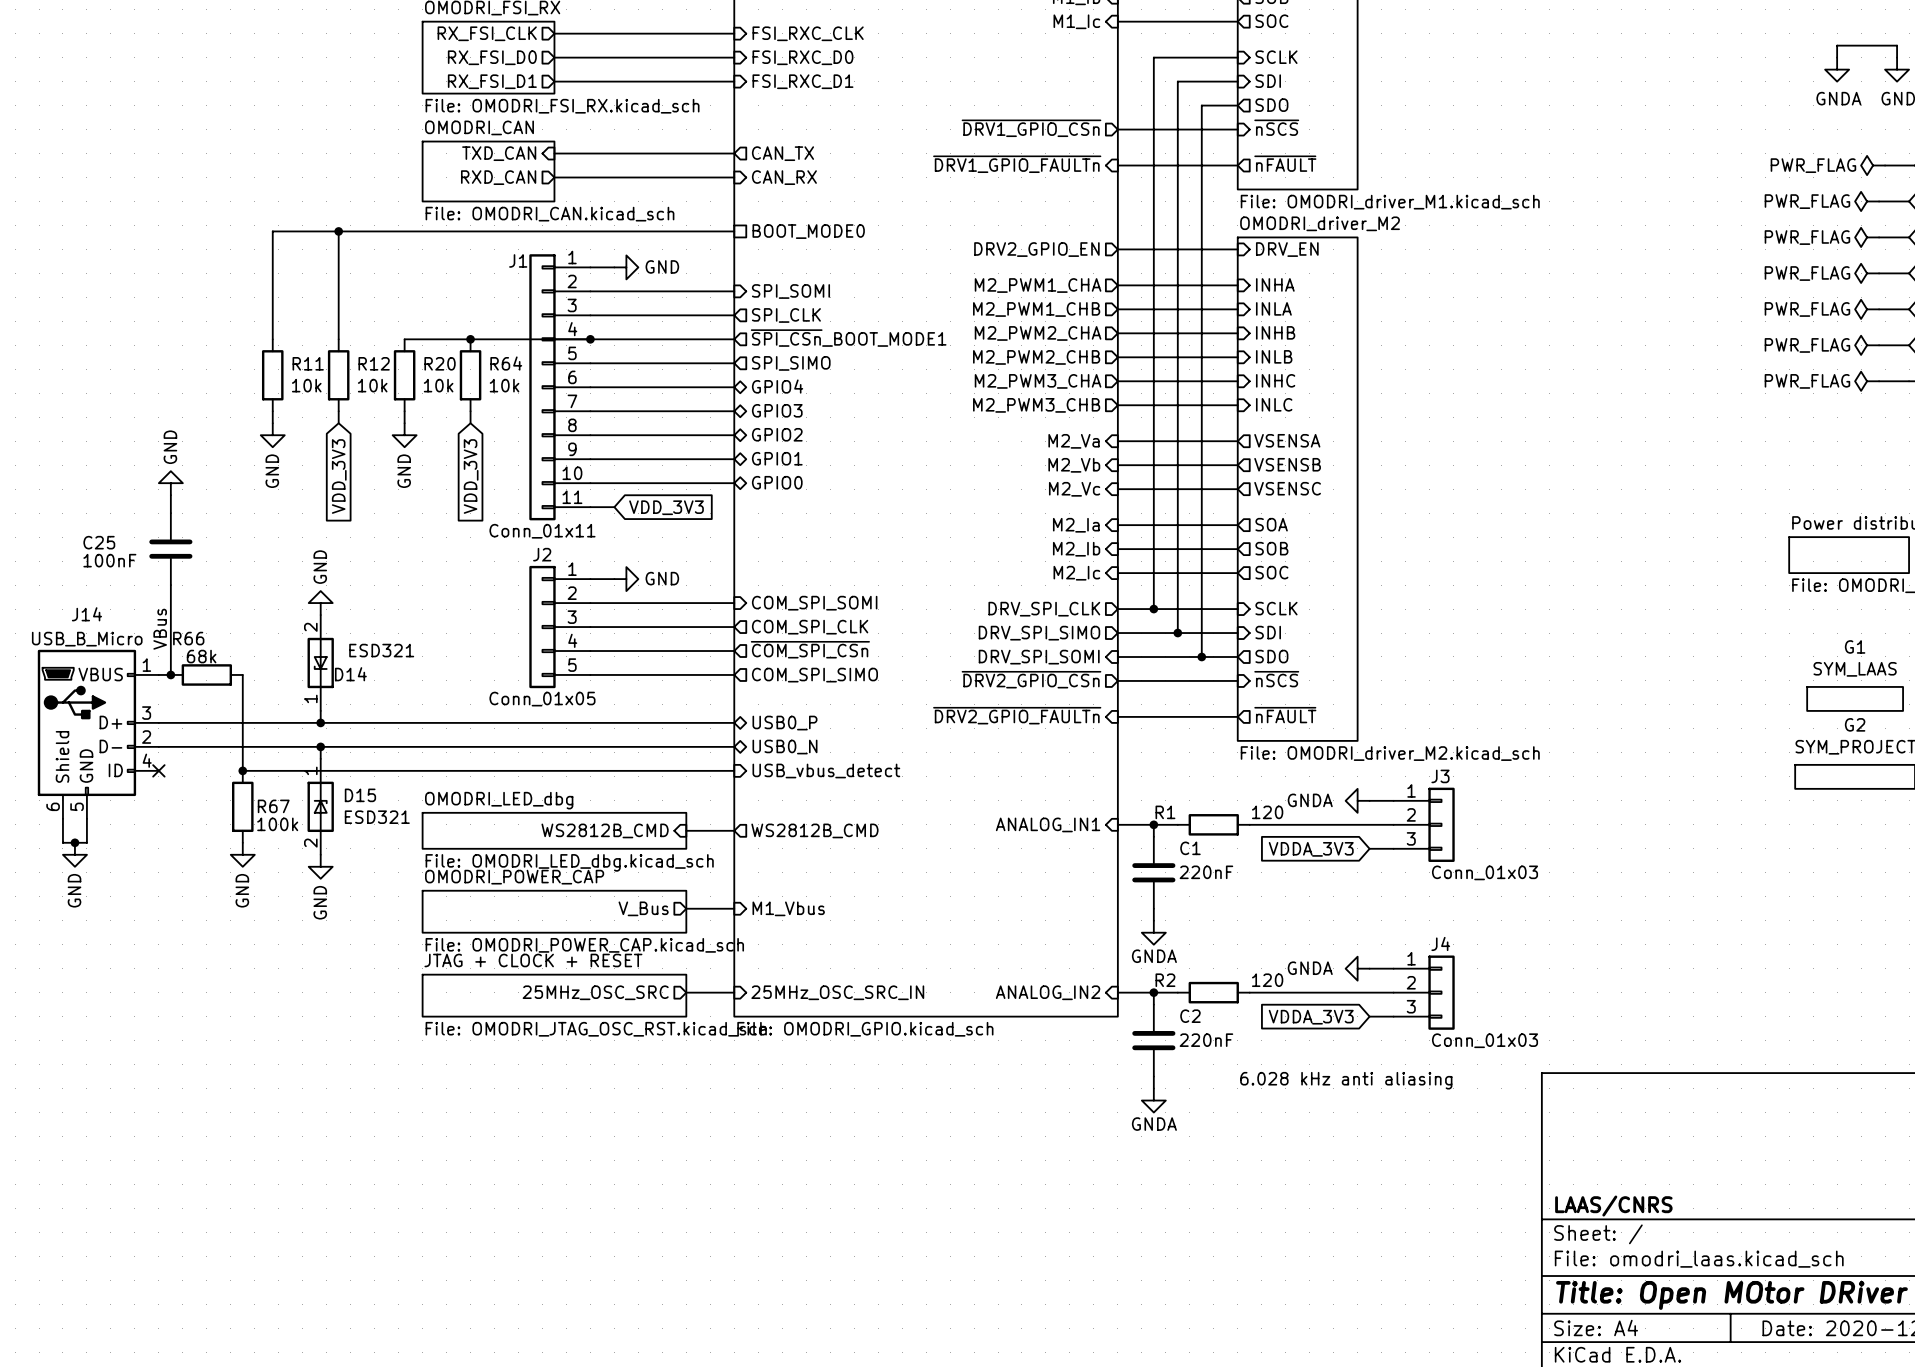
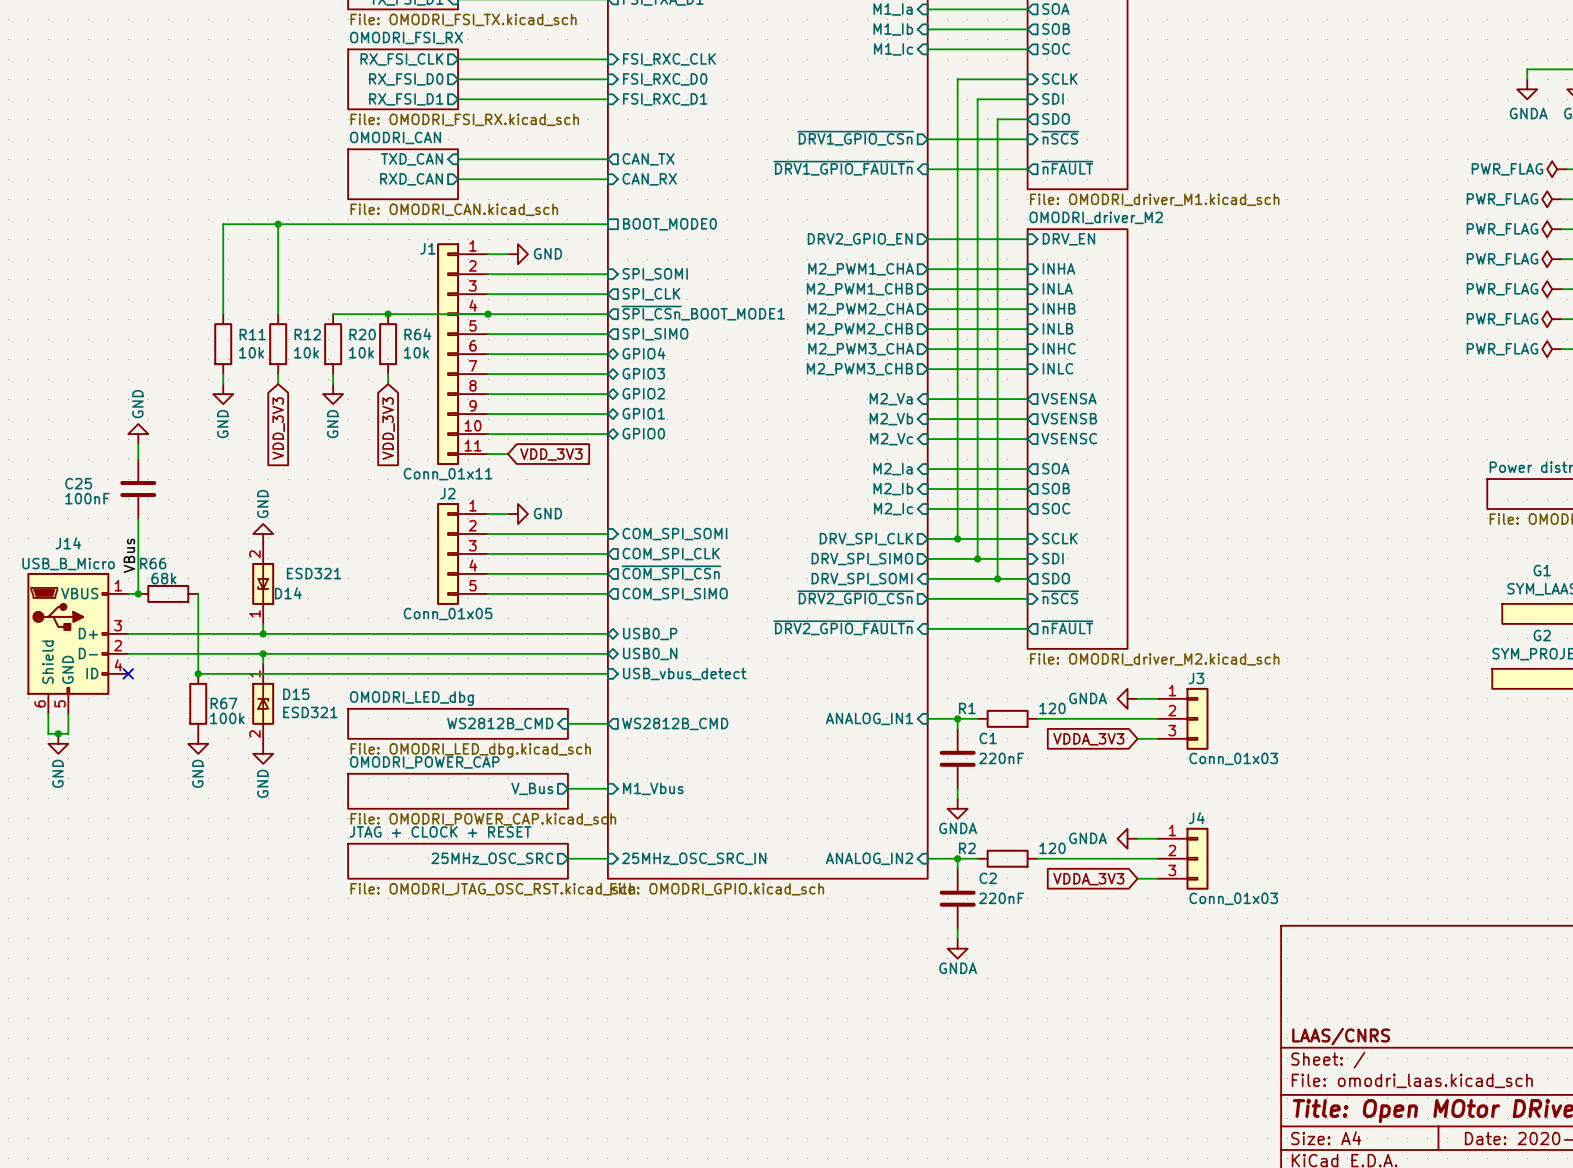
text: 6.028 kHz anti aliasing (1346, 1080) -> none

